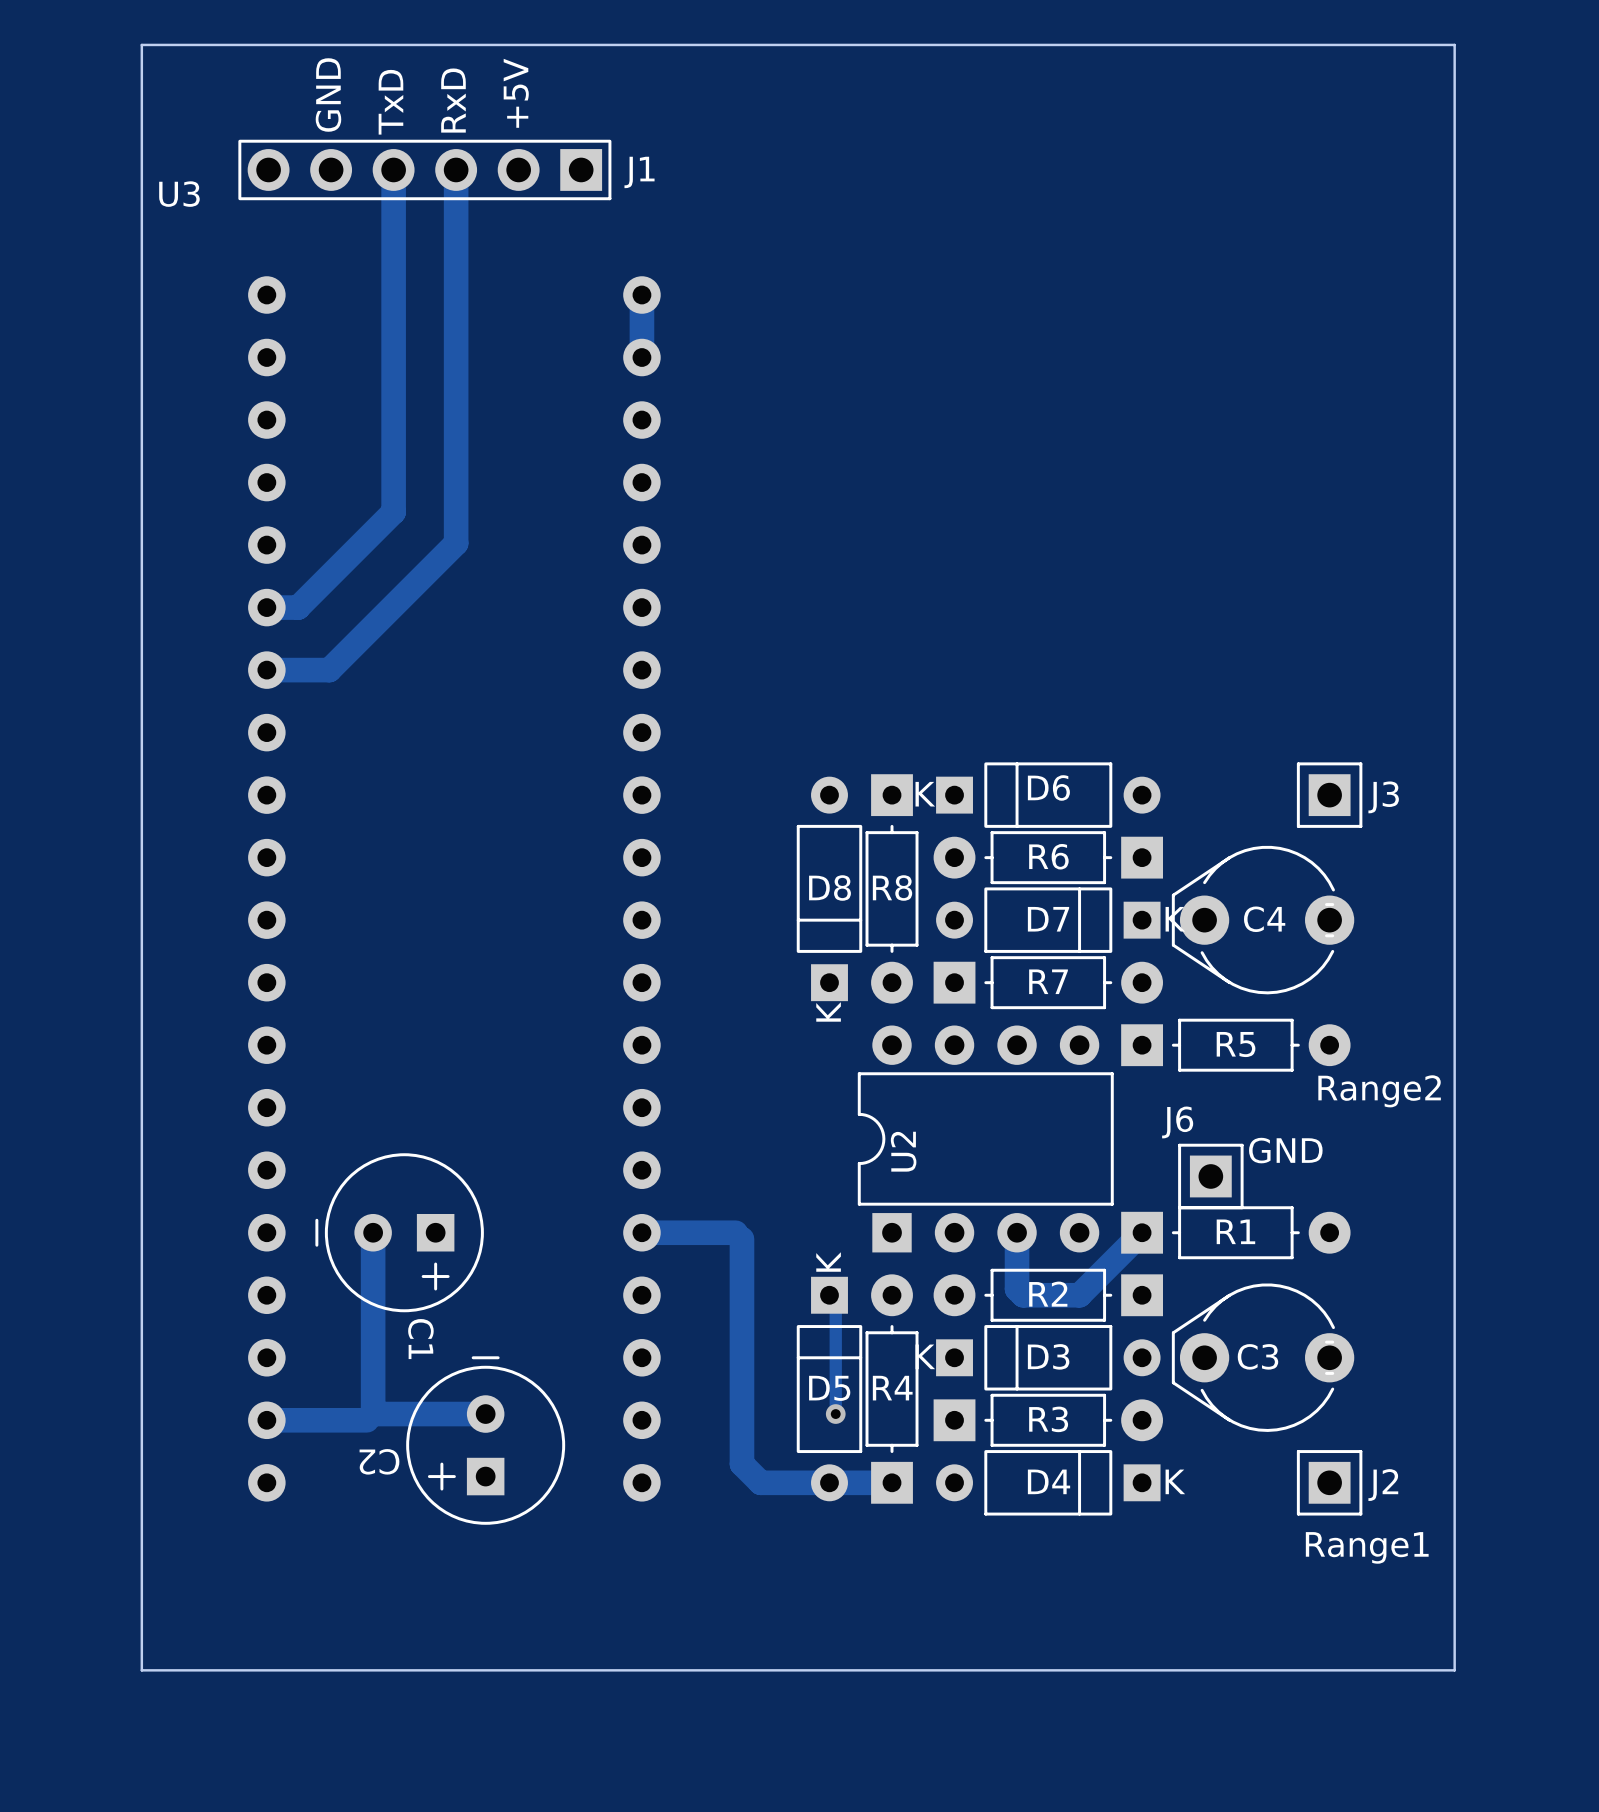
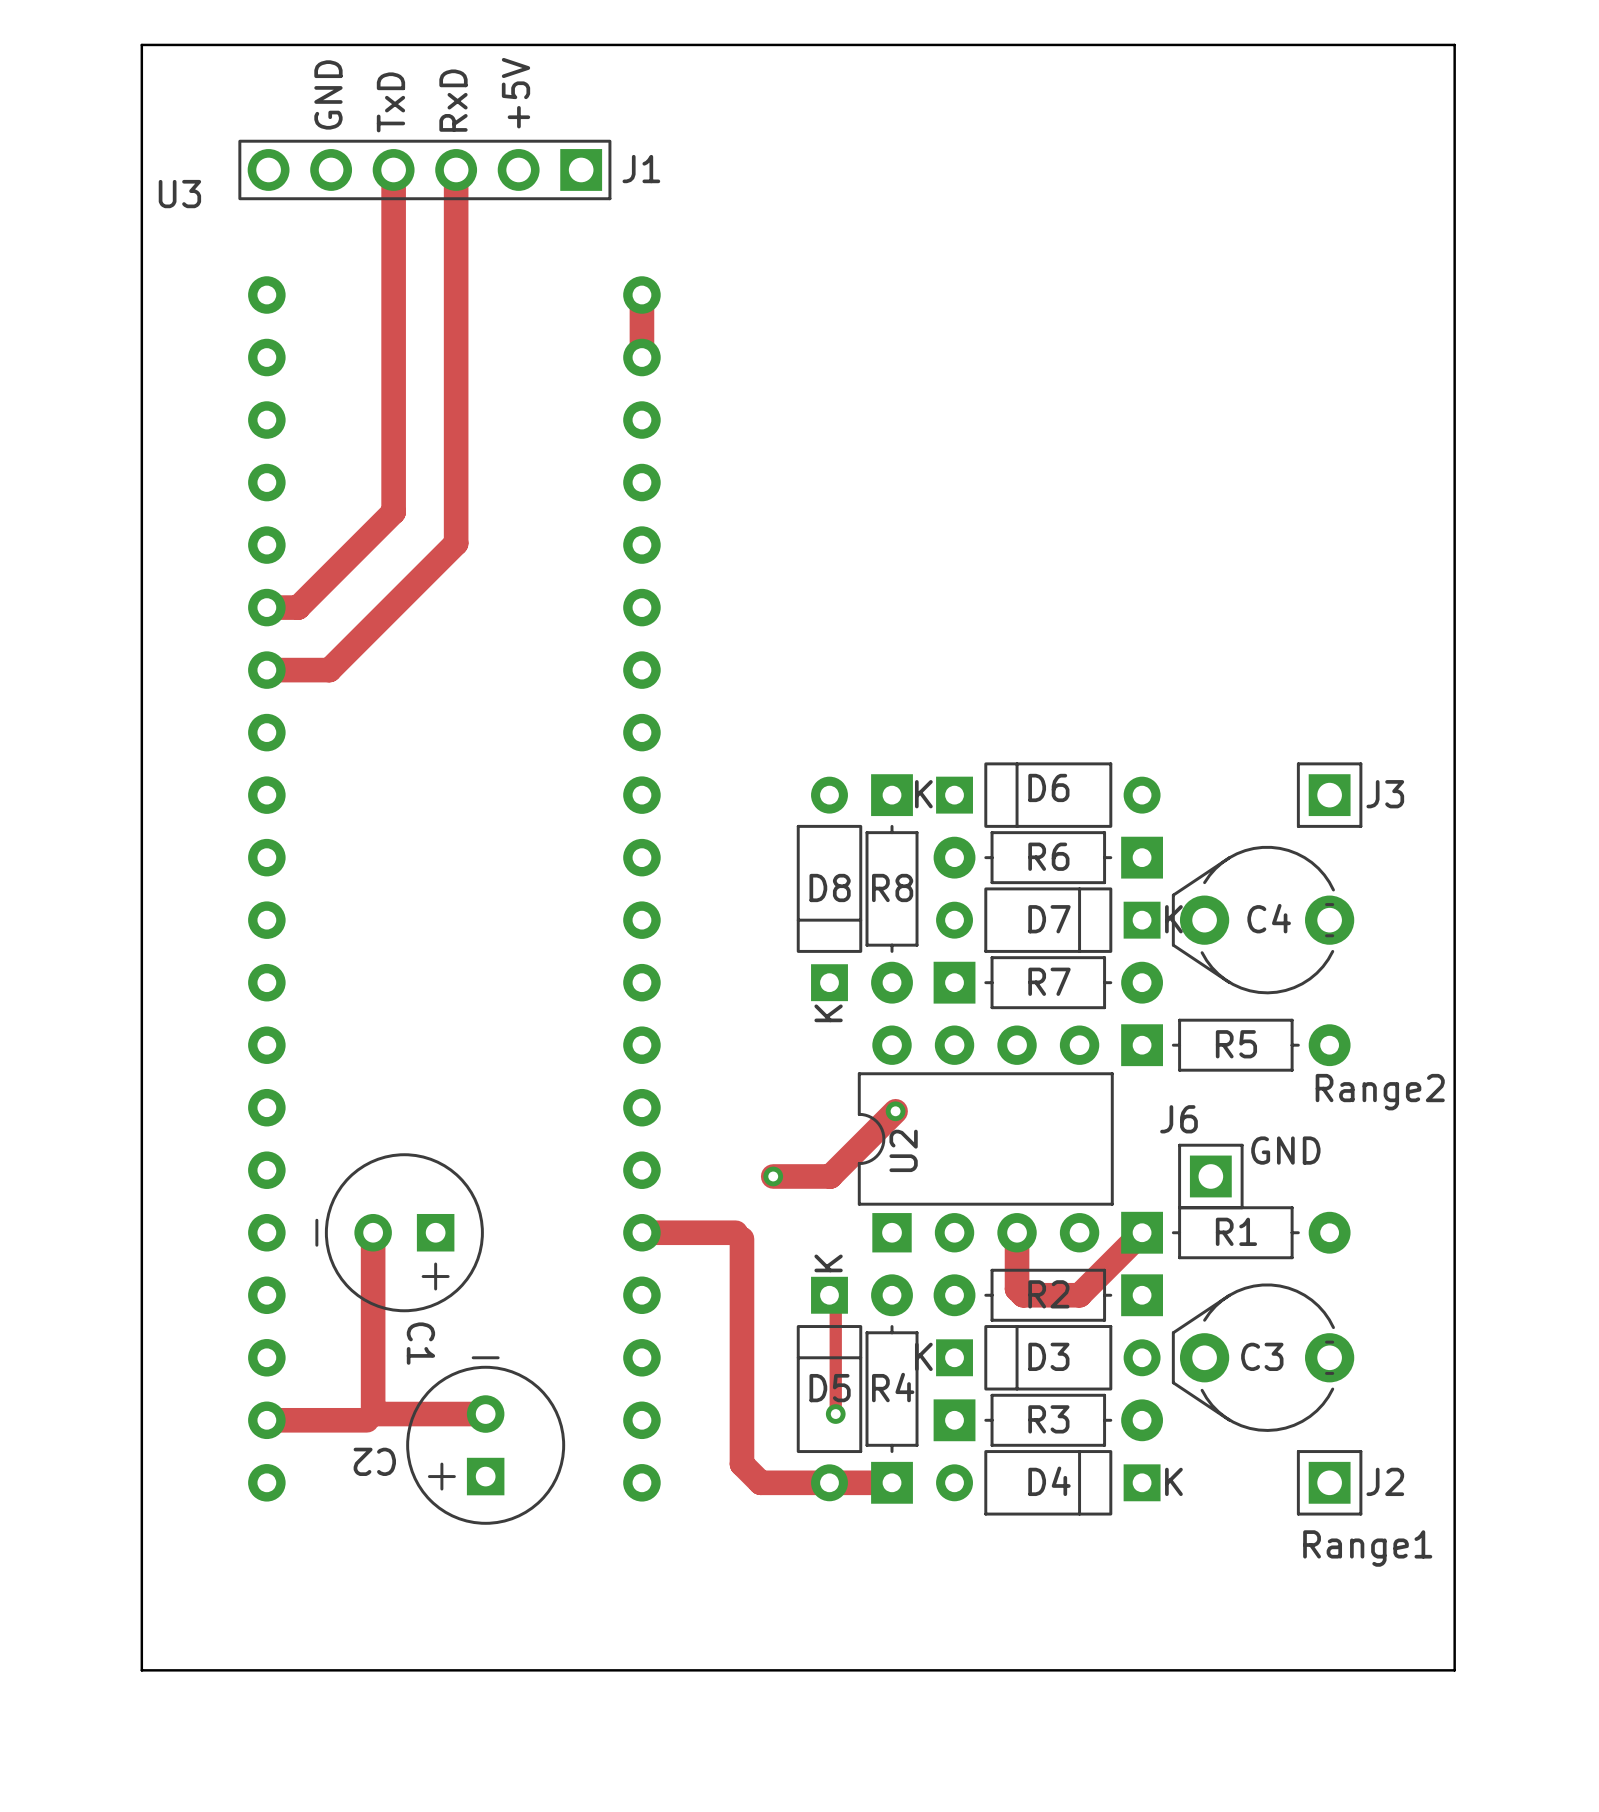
track: none -> (895, 1111) (830, 1176) (773, 1176)
via: none -> (895, 1111)
via: none -> (773, 1176)

